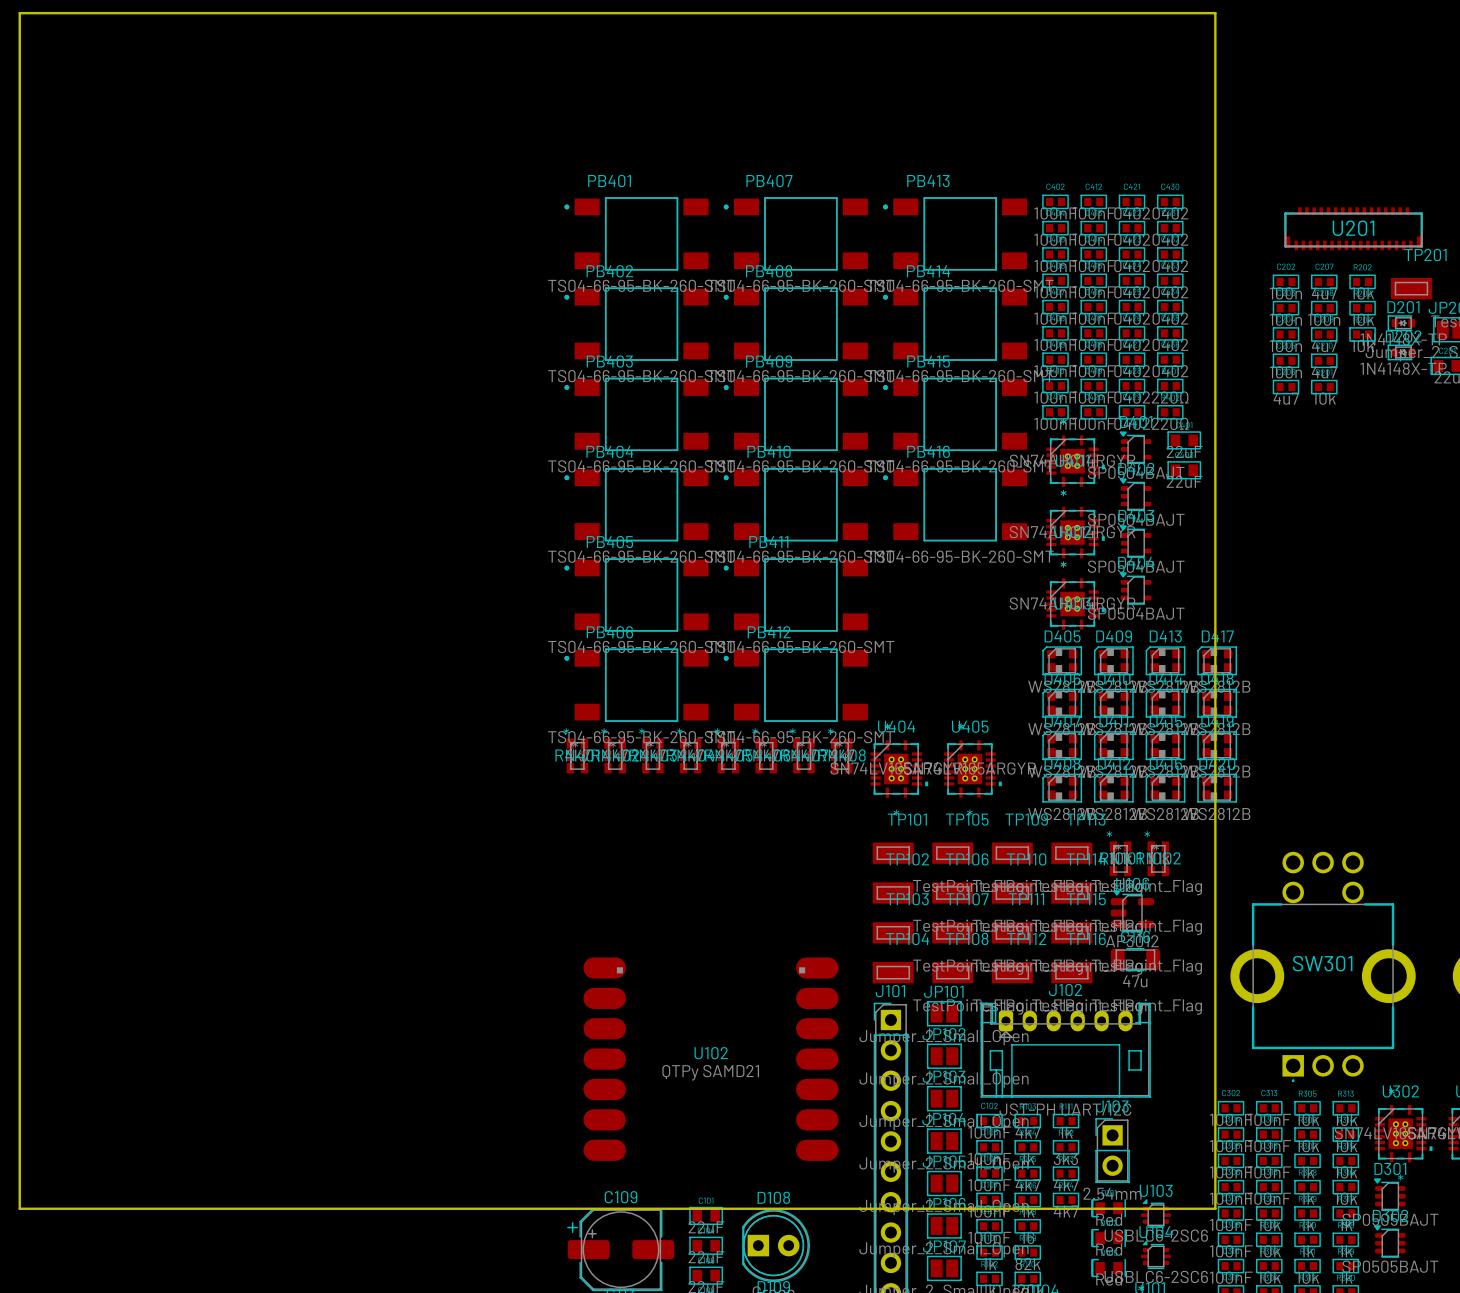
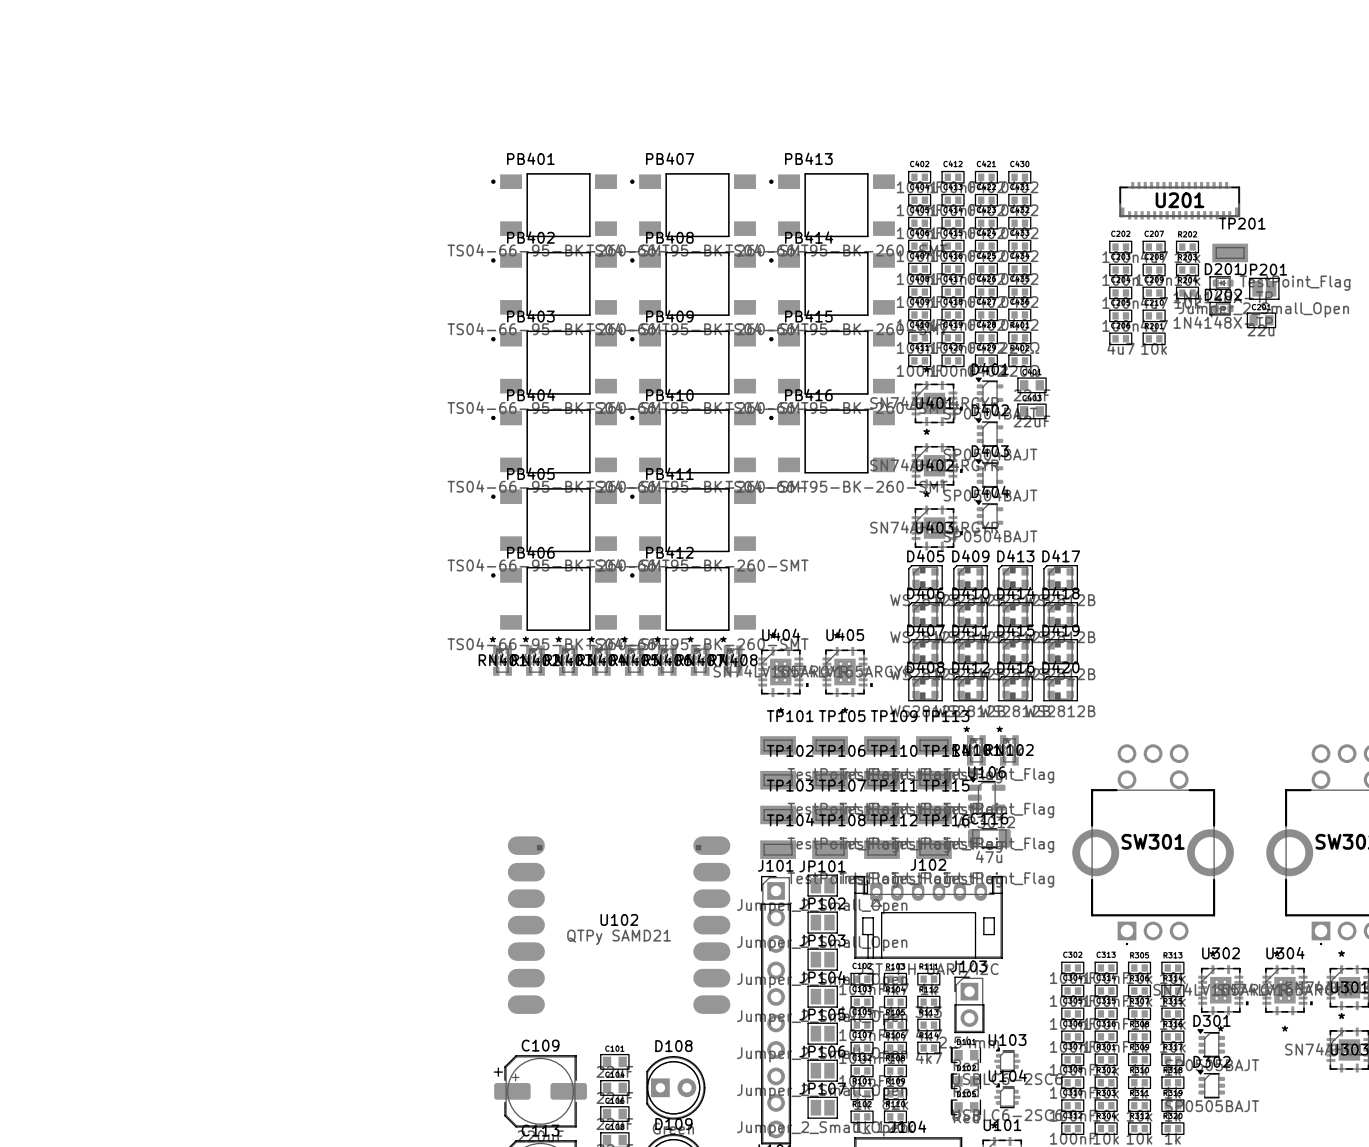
board edge: (19, 13) (1215, 13) (1215, 1208) (19, 1208) (19, 13) -> none

